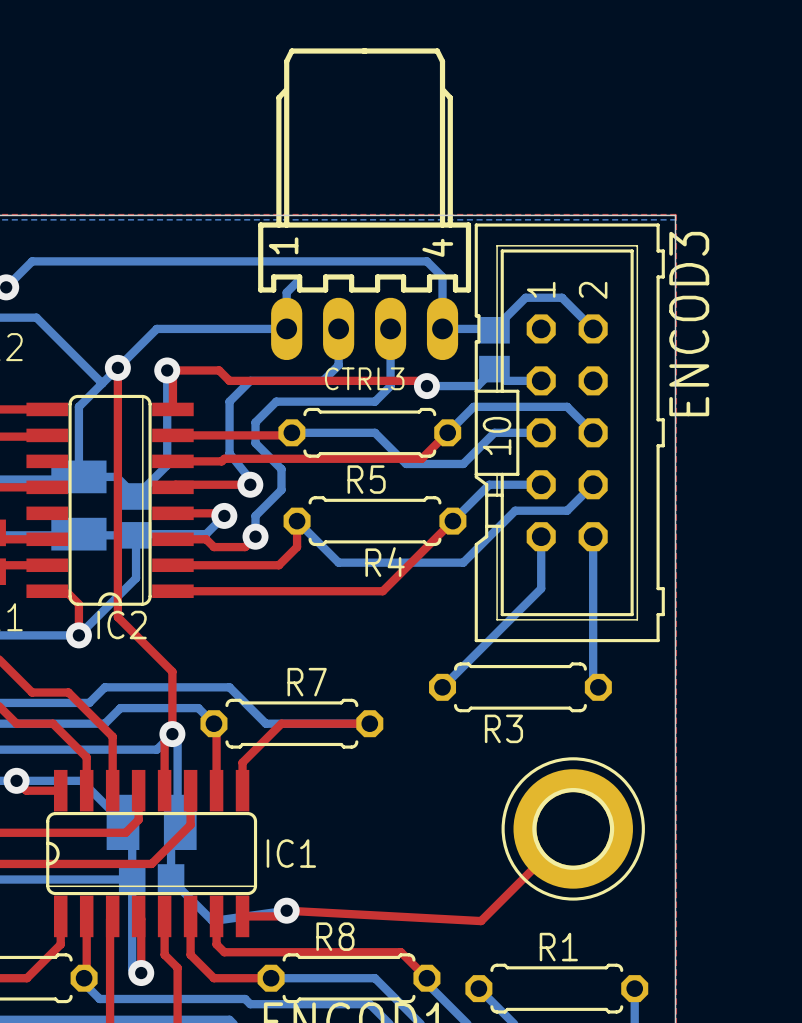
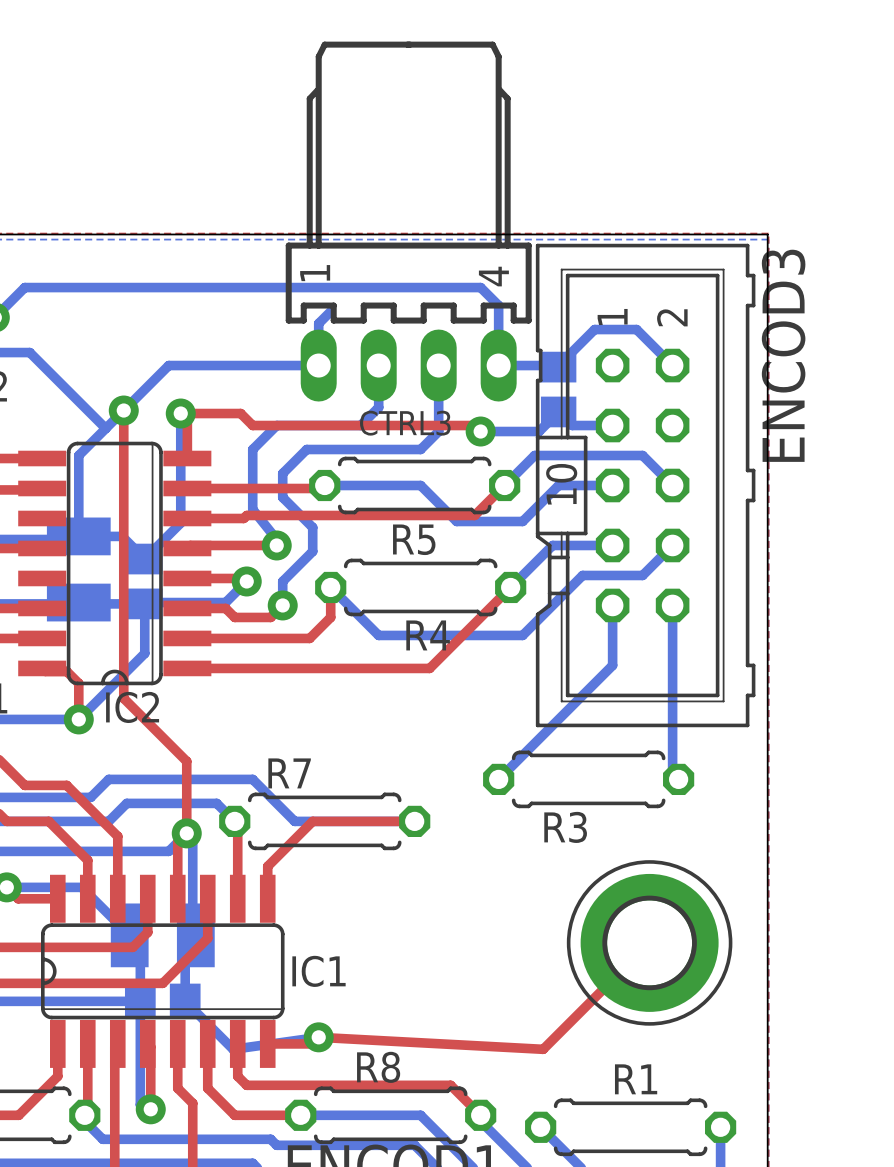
R7 name position: R7 (307, 682) -> R7 (289, 773)

